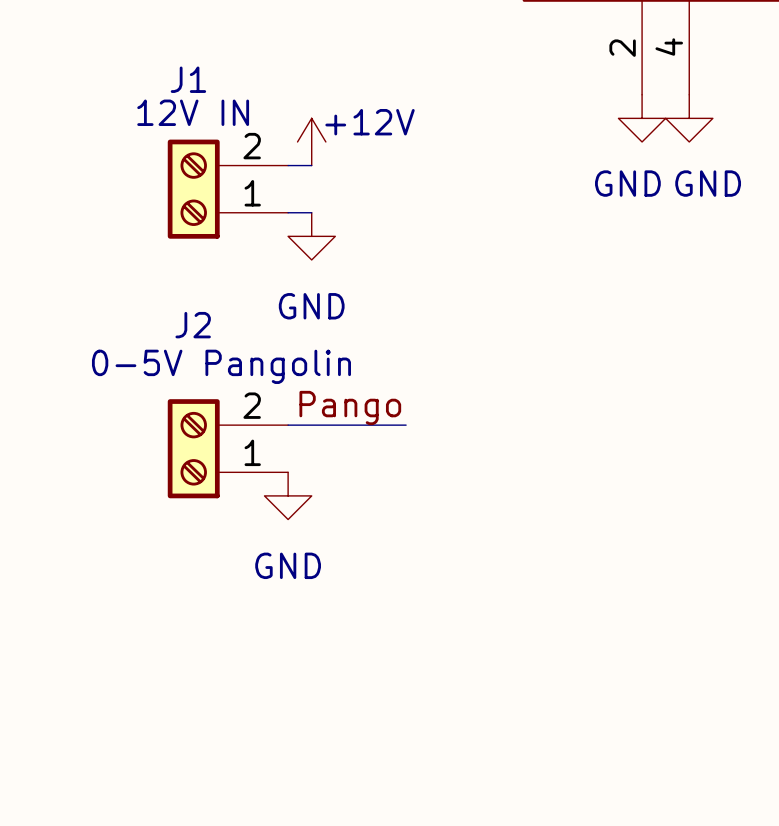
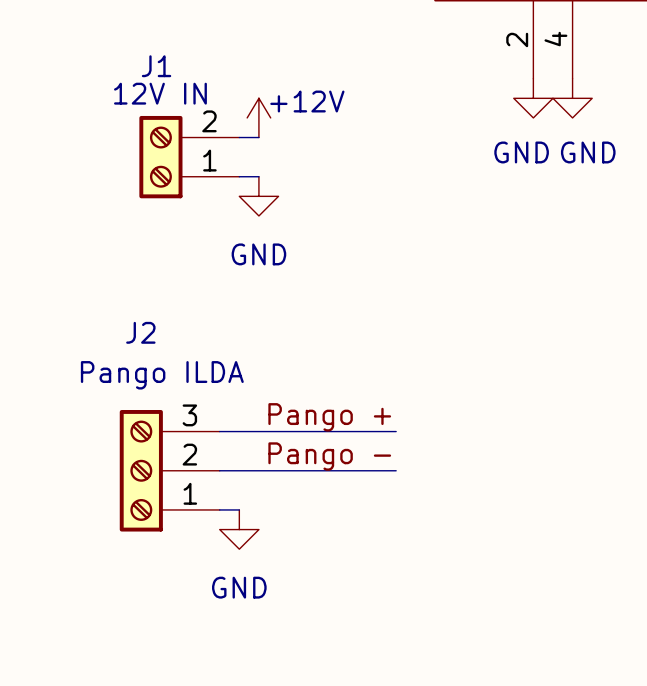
J2 name position: J2 (193, 325) -> J2 (140, 332)
J2 value: 0-5V Pangolin (221, 366) -> Pango ILDA (162, 375)
J2 symbol: [167, 399, 289, 499] -> [119, 410, 220, 532]
label: Pango (350, 408) -> none
wire: (288, 425) (406, 425) -> none
power symbol position: GND (288, 495) -> GND (239, 529)
label: none -> Pango + (329, 417)
wire: none -> (219, 431) (396, 431)
label: none -> Pango - (329, 456)
wire: none -> (219, 470) (396, 470)
wire: none -> (219, 509) (239, 509)

